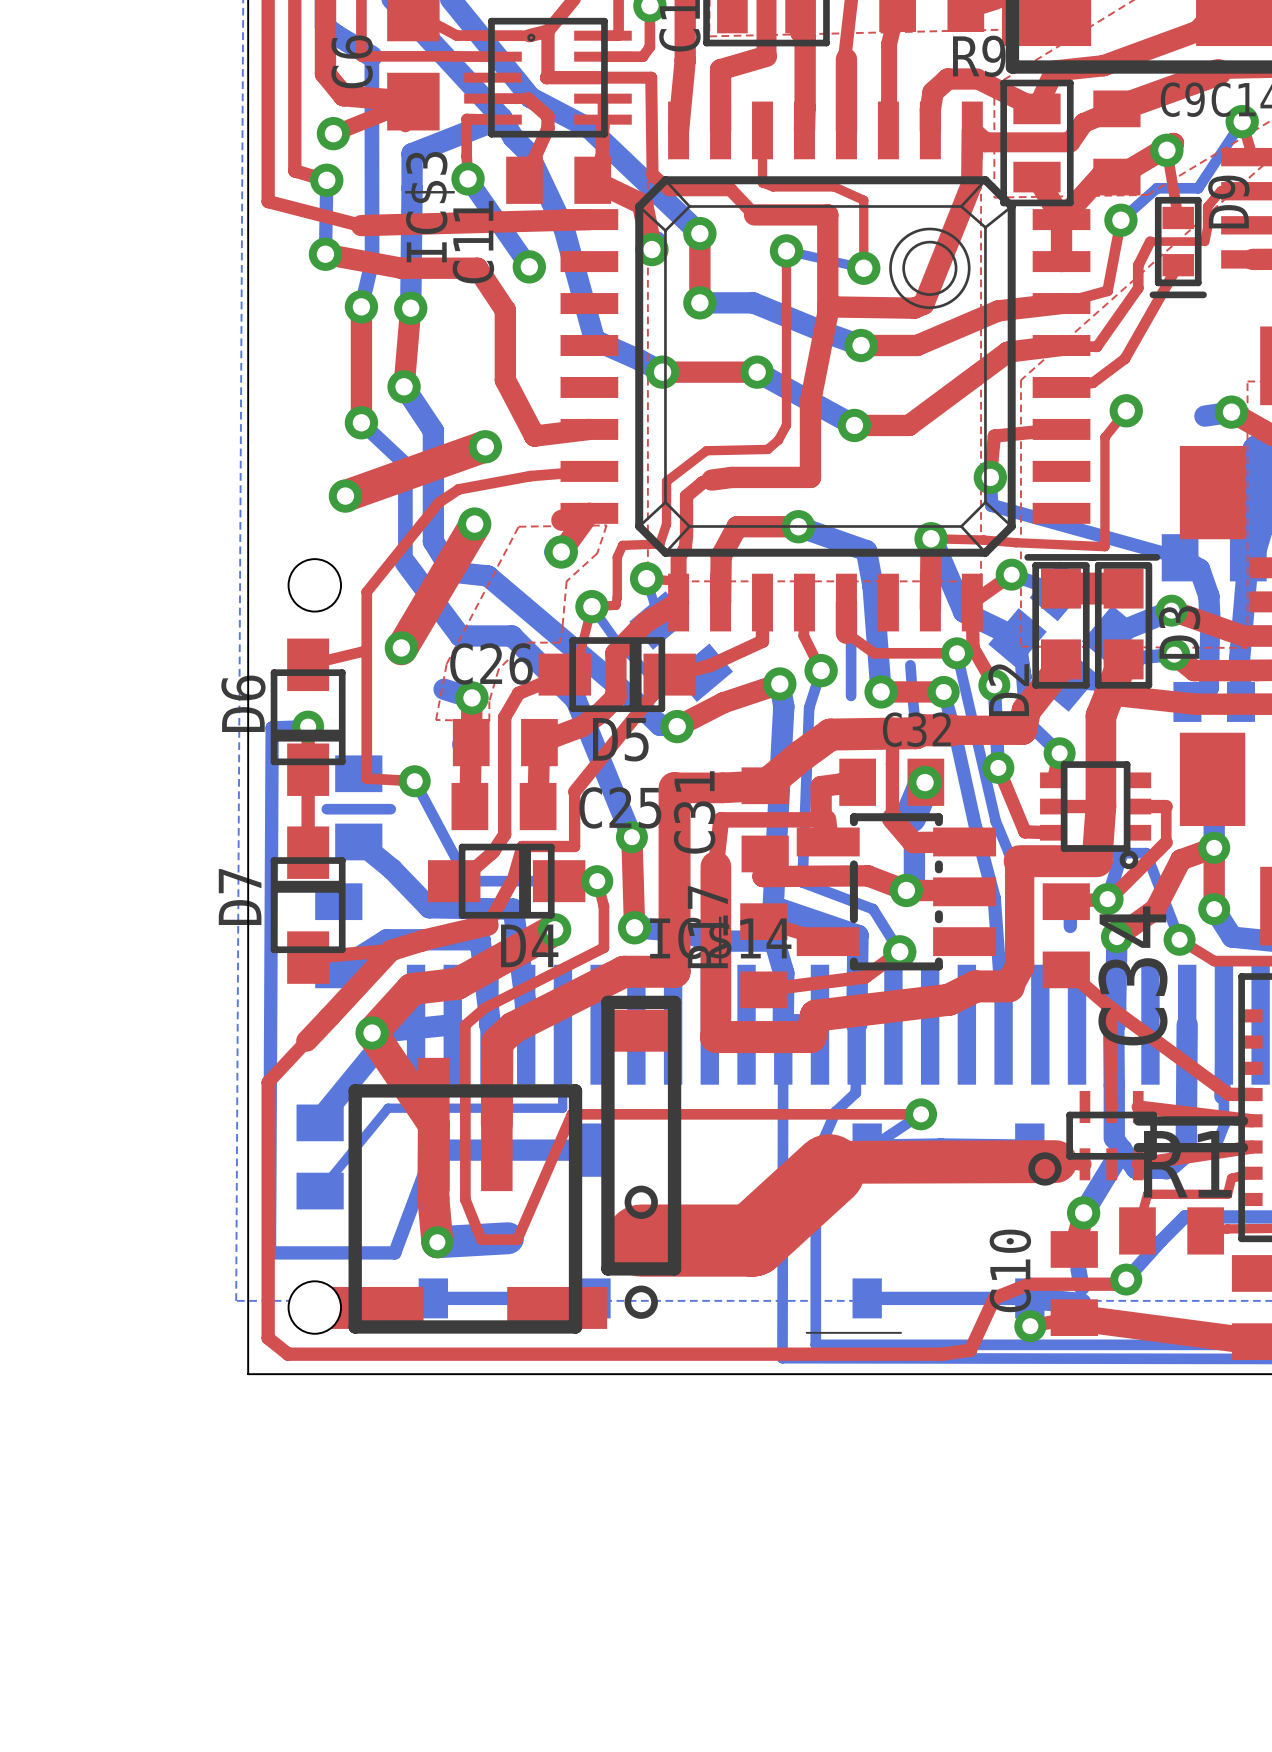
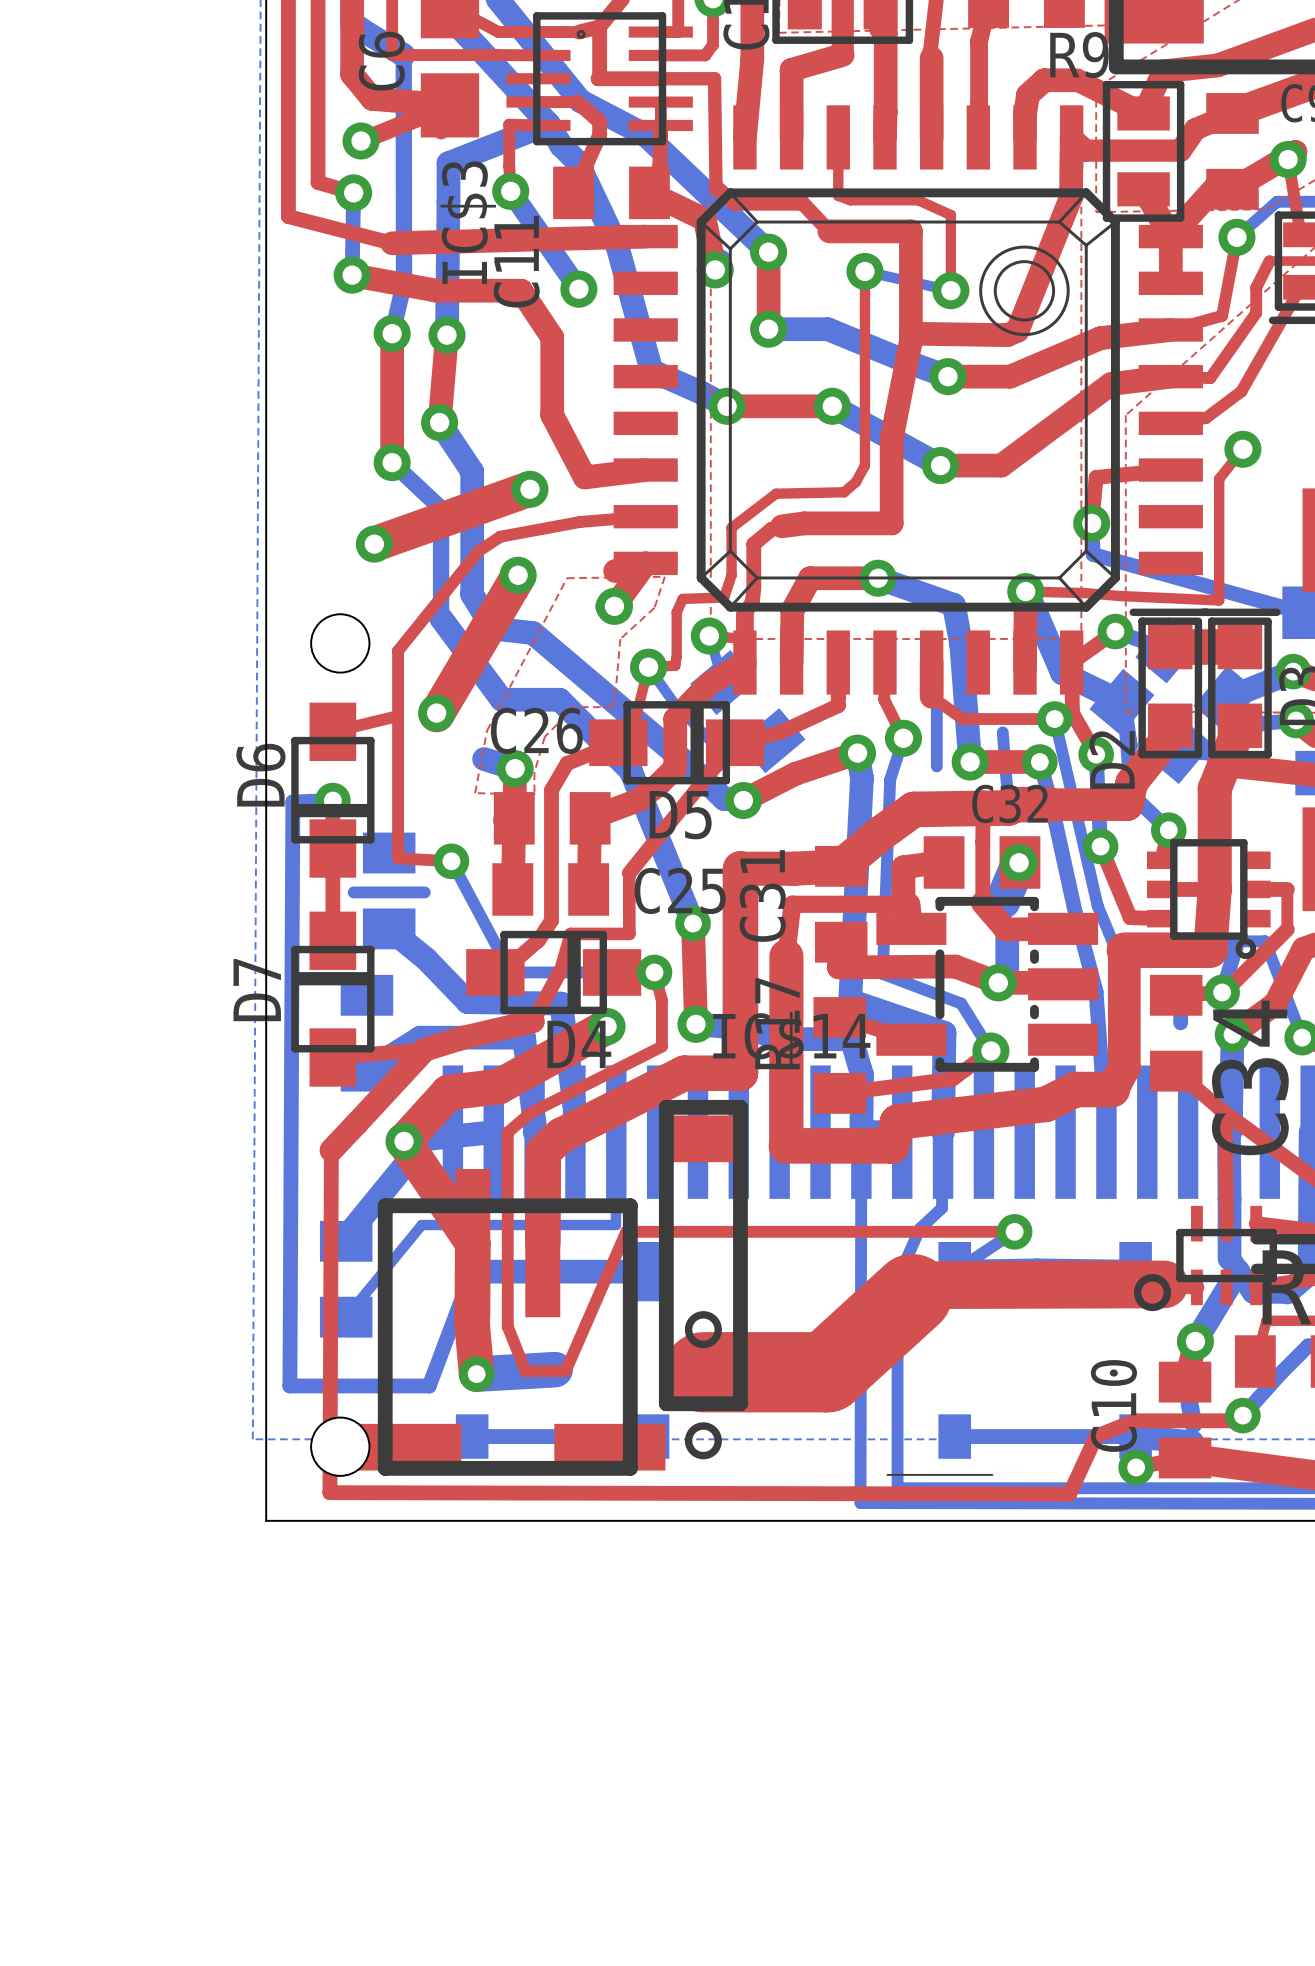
top track: (306, 1041) (268, 1082) (268, 1338) (288, 1354) (942, 1354) (970, 1350) -> (331, 1150) (329, 1492) (1069, 1494)

